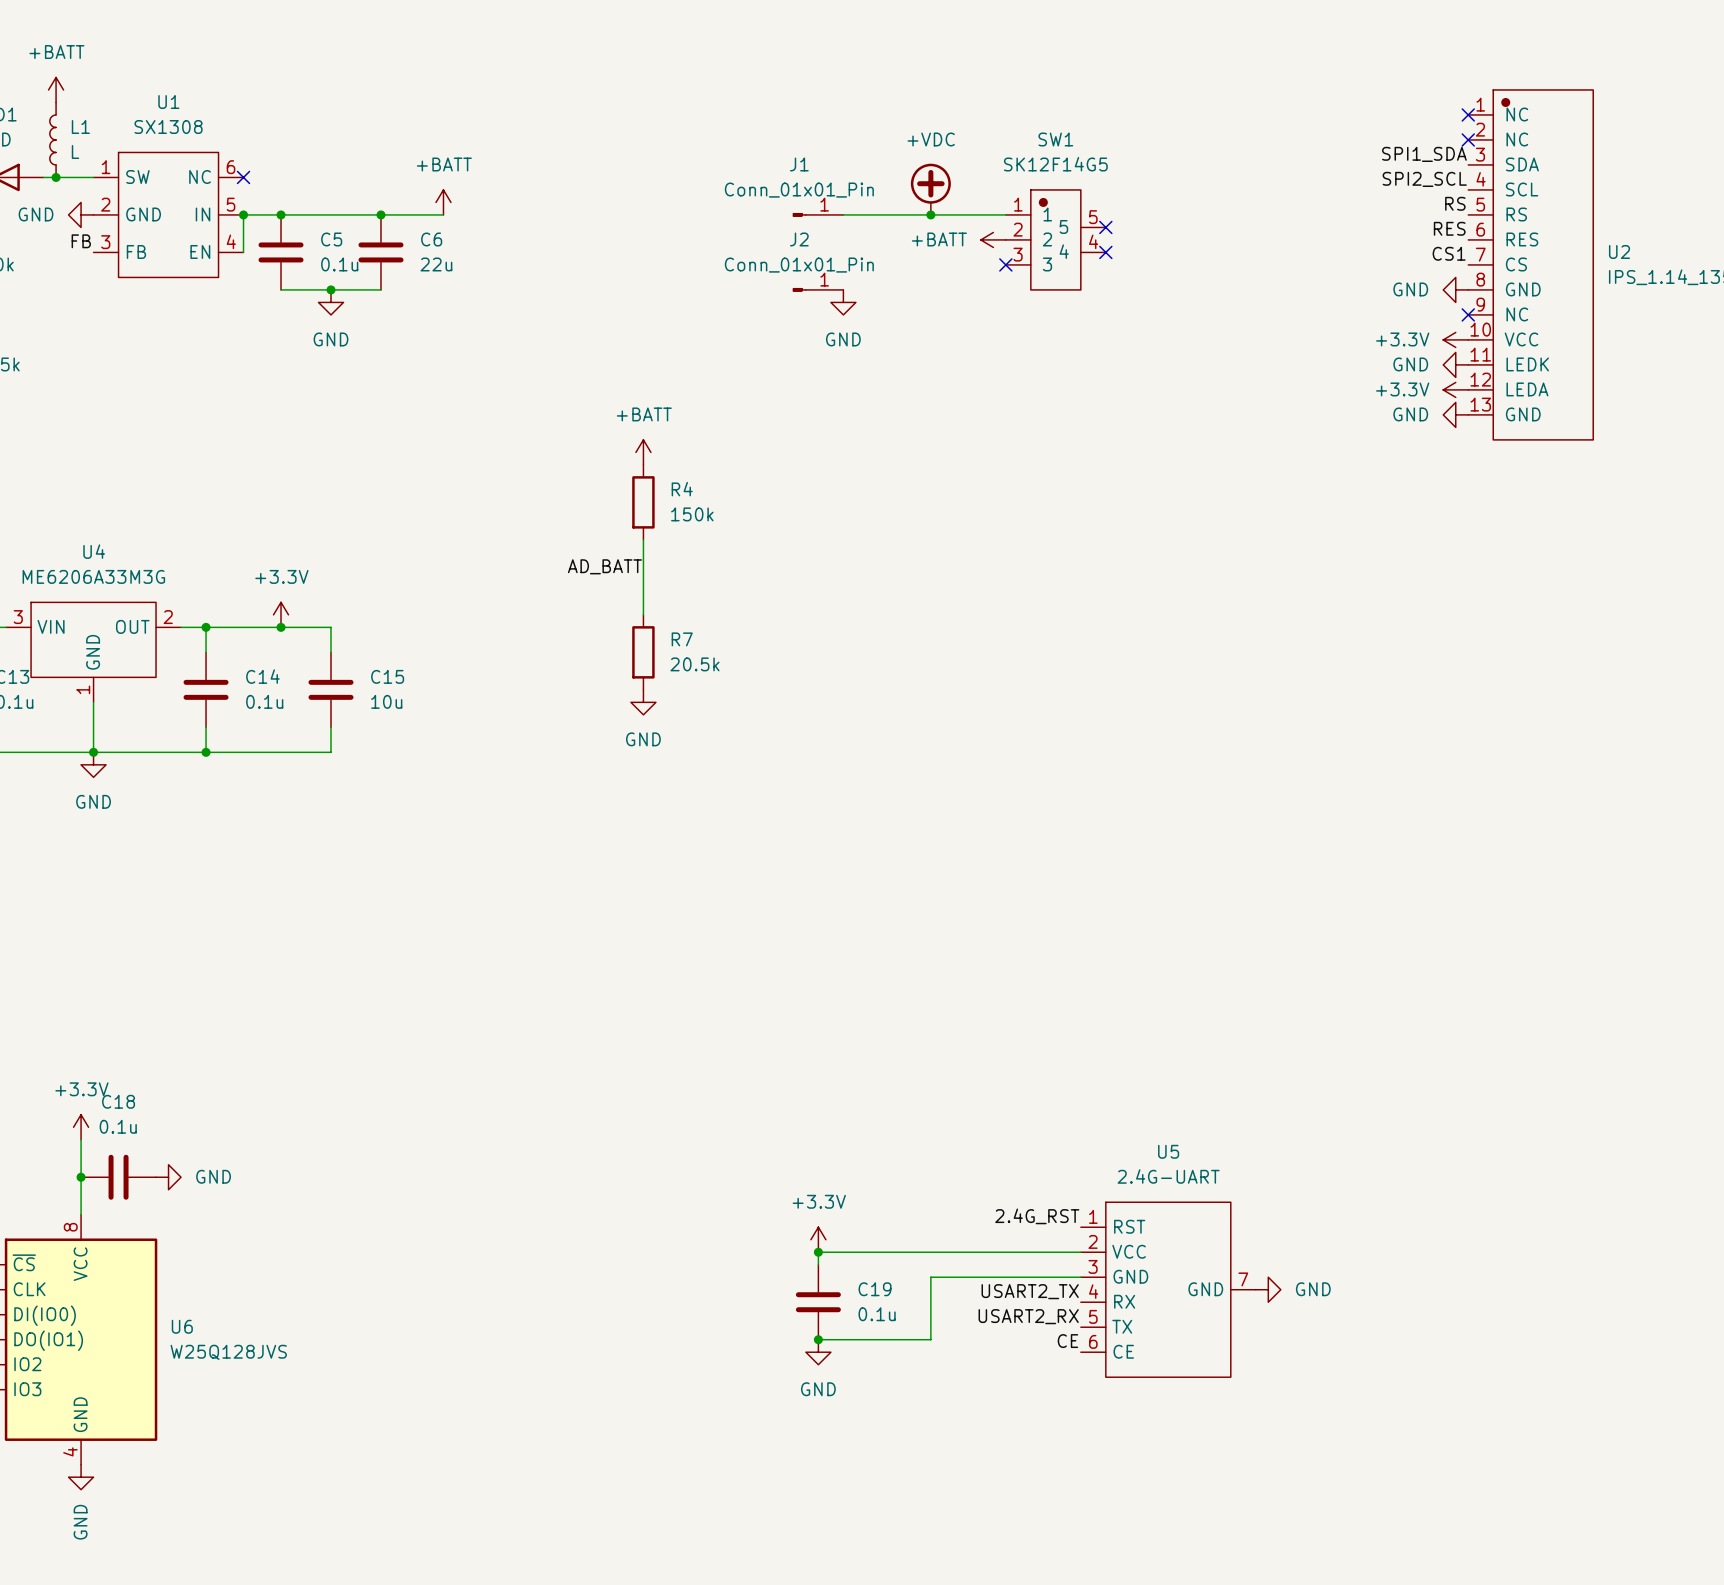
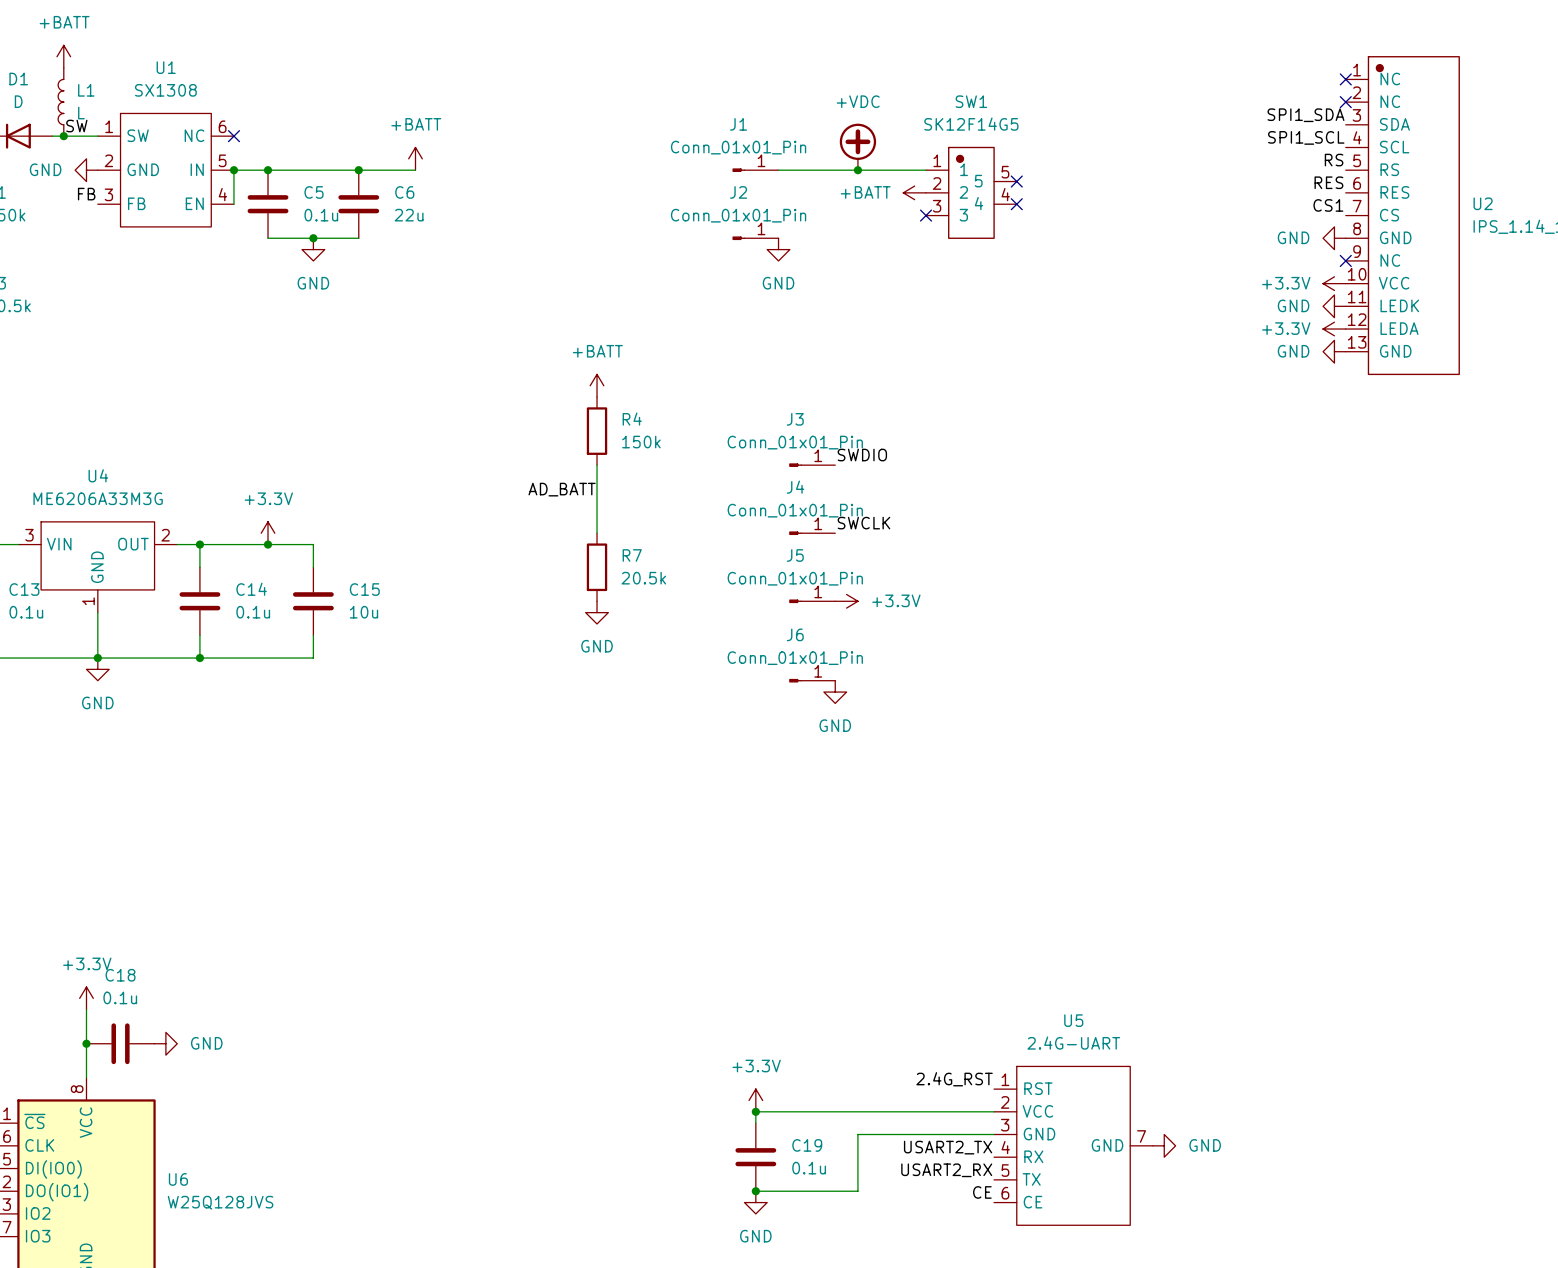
label: none -> SW (76, 126)
label: SPI2_SCL (1424, 179) -> SPI1_SCL (1306, 137)
label: none -> SWDIO (862, 455)
J3: none -> Conn_01x01_Pin (812, 465)
label: none -> SWCLK (863, 523)
J4: none -> Conn_01x01_Pin (812, 533)
J5: none -> Conn_01x01_Pin (812, 601)
power symbol: none -> +3.3V (846, 601)
J6: none -> Conn_01x01_Pin (812, 680)
power symbol: none -> GND (835, 692)

